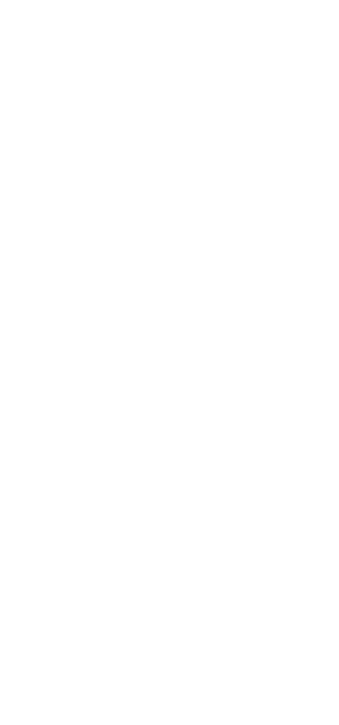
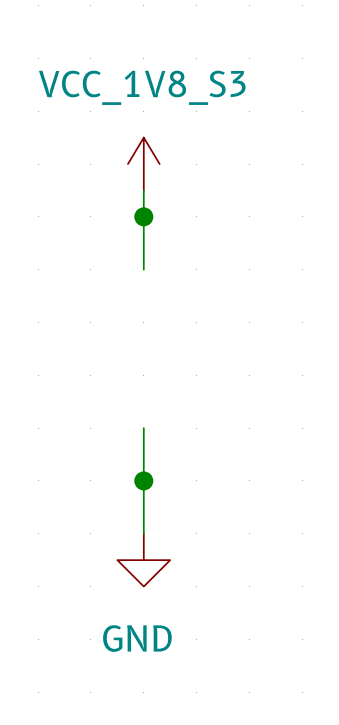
power symbol: none -> VCC_1V8_S3 (143, 164)
wire: none -> (143, 190) (143, 269)
junction: none -> (143, 216)
wire: none -> (143, 428) (143, 533)
junction: none -> (143, 480)
power symbol: none -> GND (143, 560)

